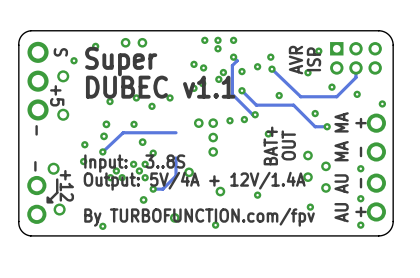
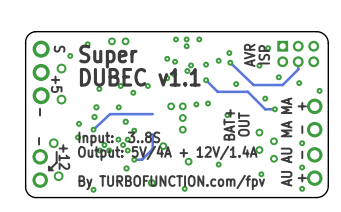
track: (233, 57) (237, 60) (232, 65) (232, 94) (252, 114) (255, 114) -> none
via: (233, 57) -> none
via: (255, 114) -> none

